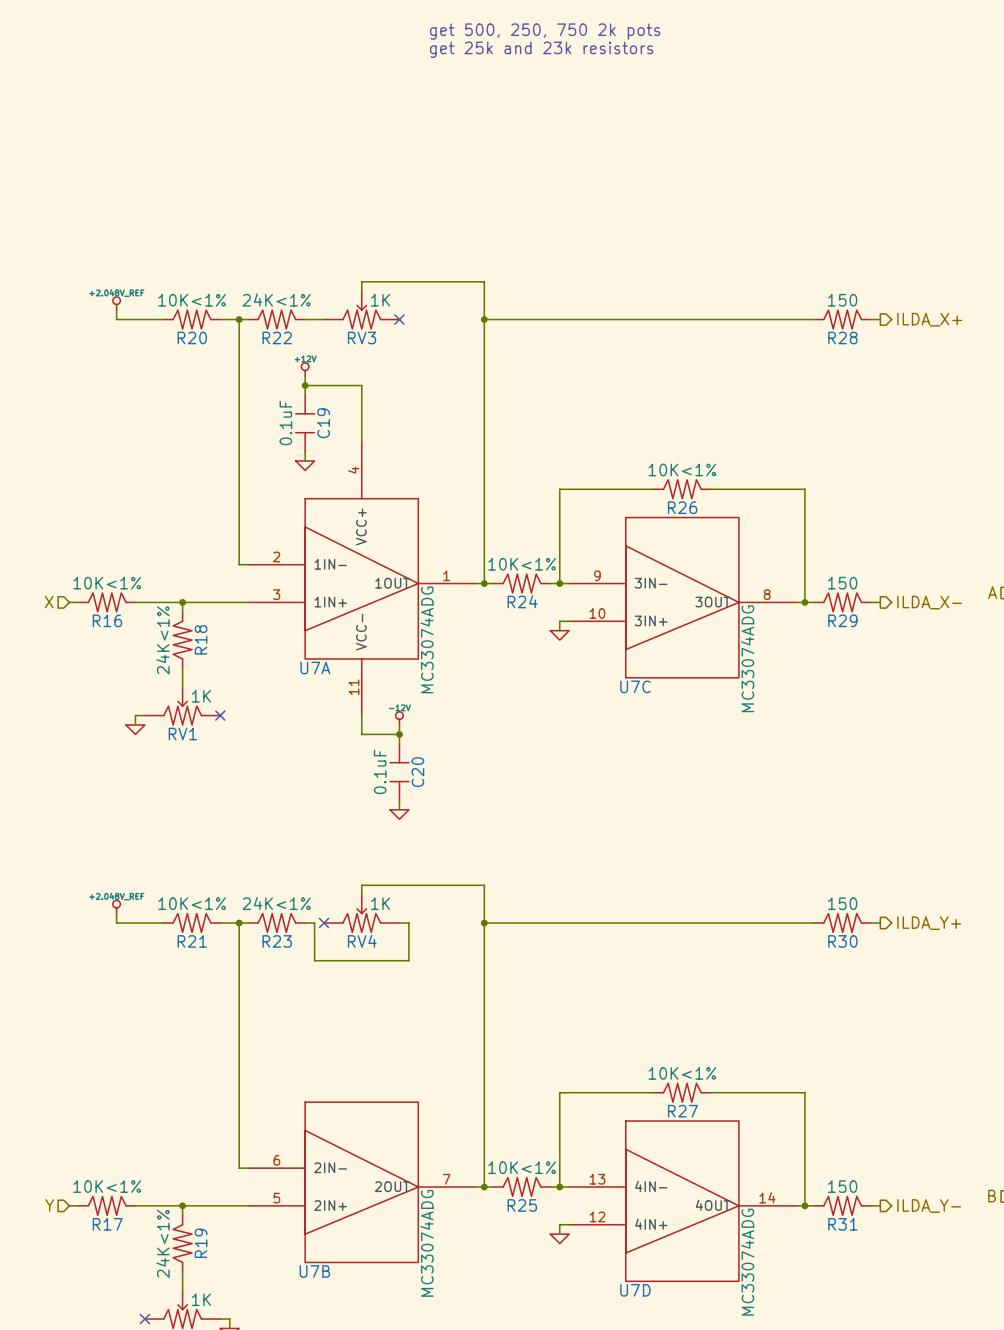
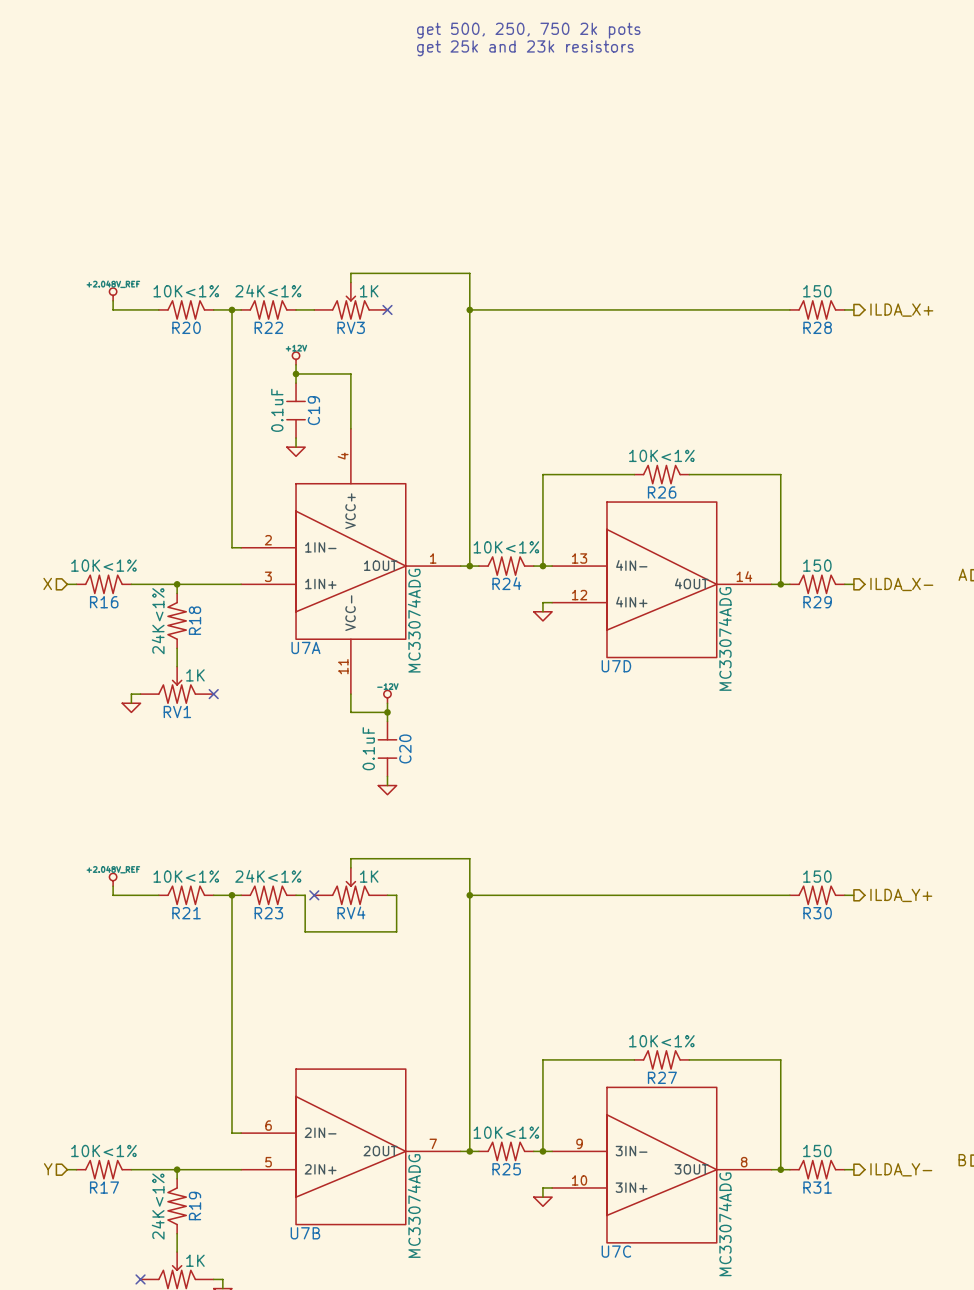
U7C position: (682, 597) -> (661, 1165)
U7D position: (682, 1201) -> (661, 579)

